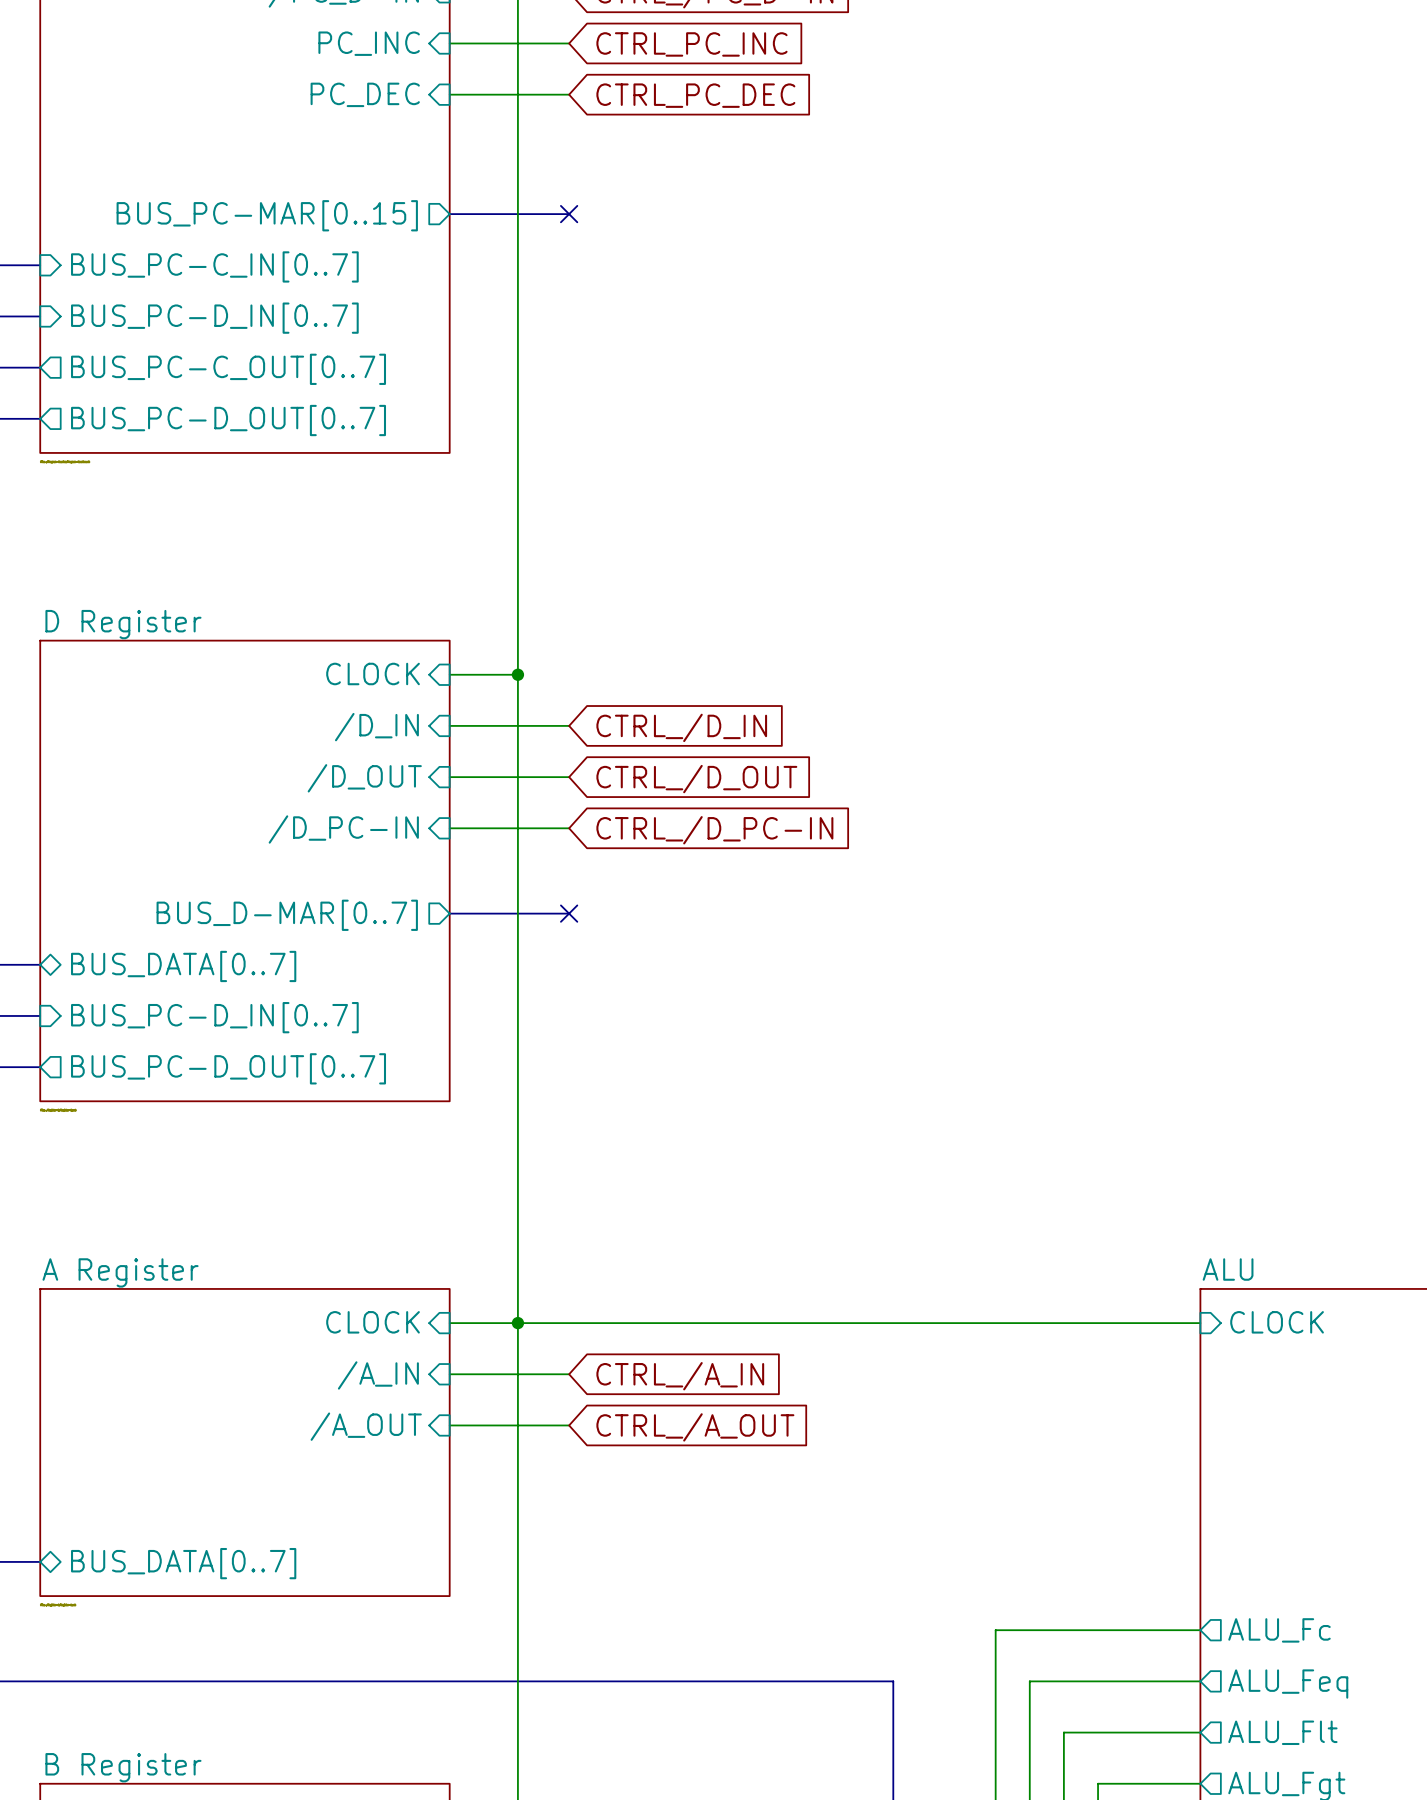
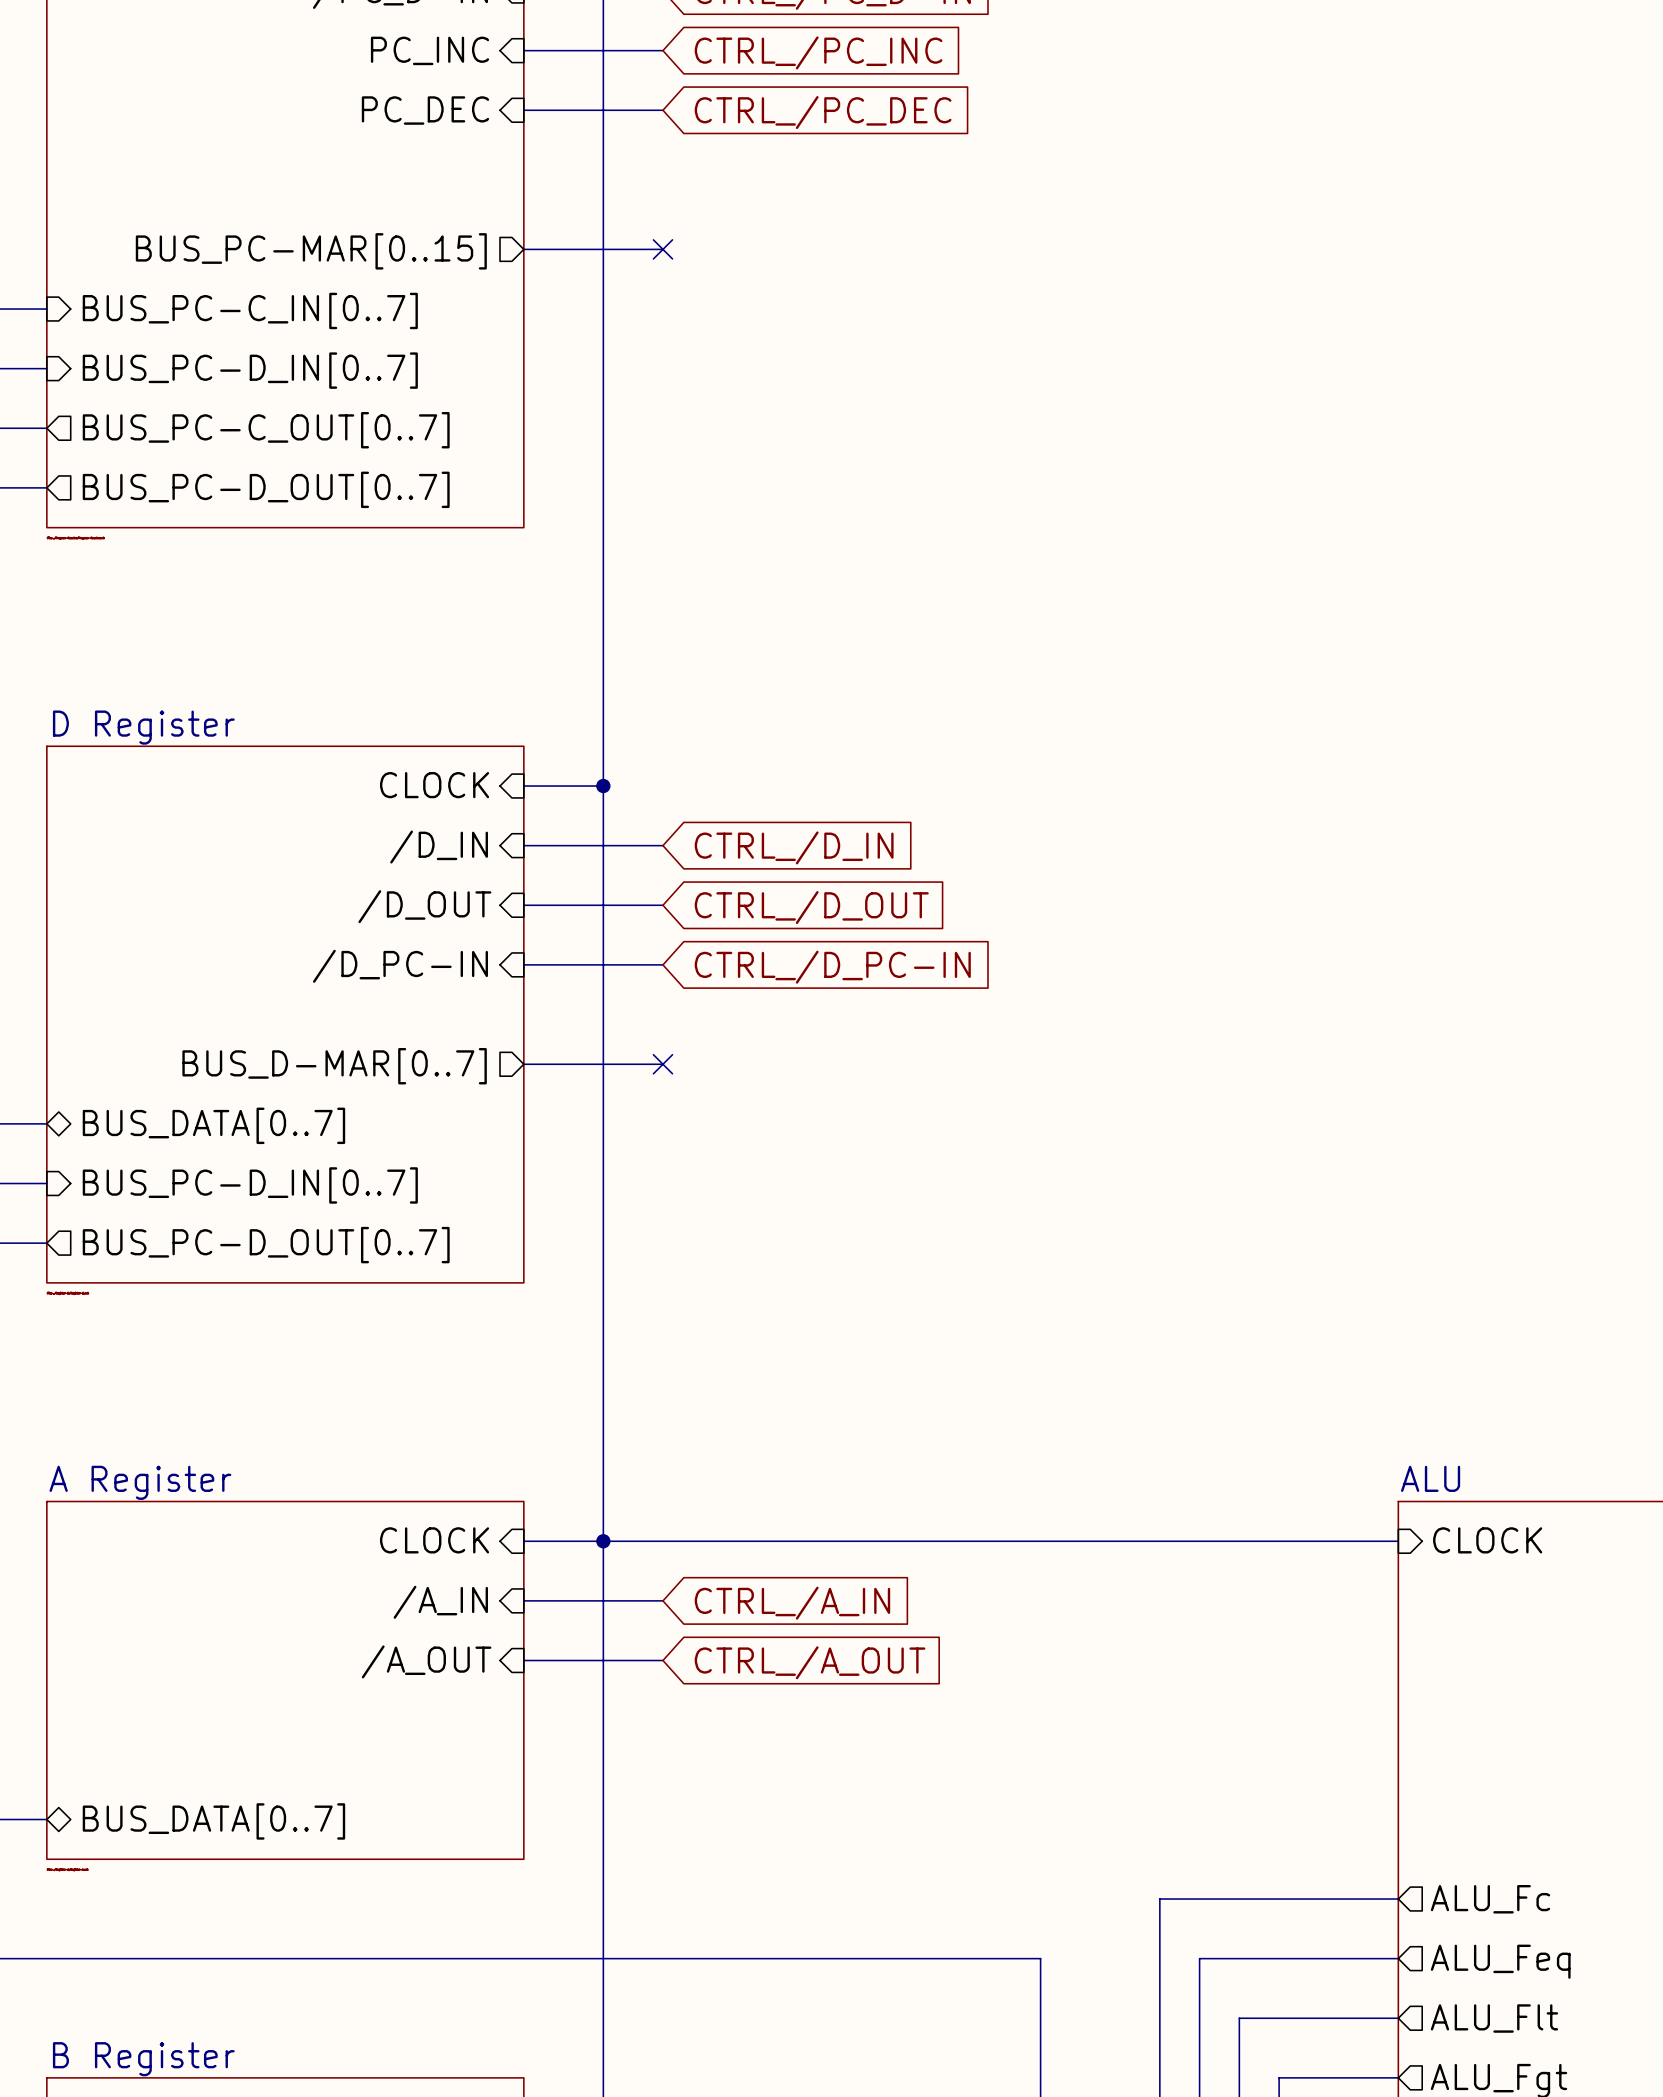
global label: CTRL_PC_INC (691, 44) -> CTRL_/PC_INC (818, 52)
global label: CTRL_PC_DEC (695, 95) -> CTRL_/PC_DEC (823, 112)

